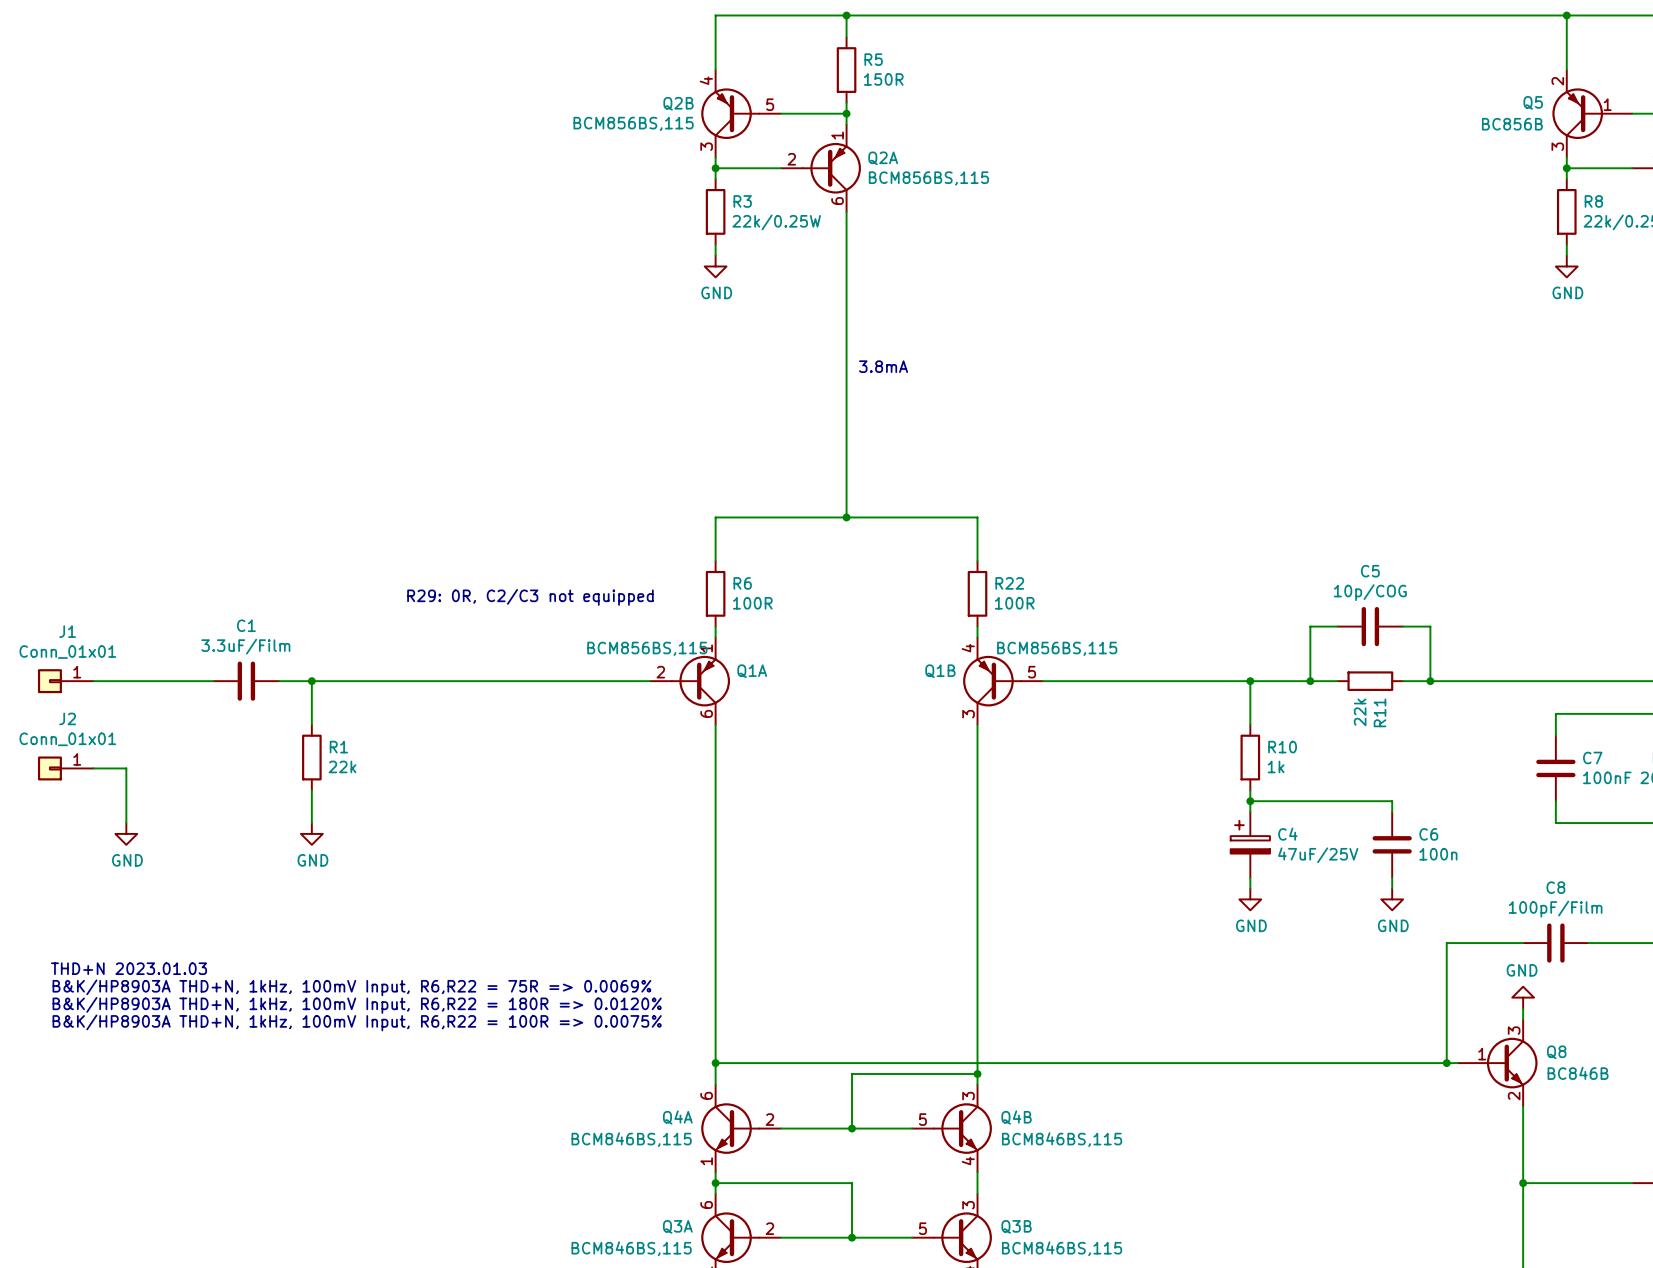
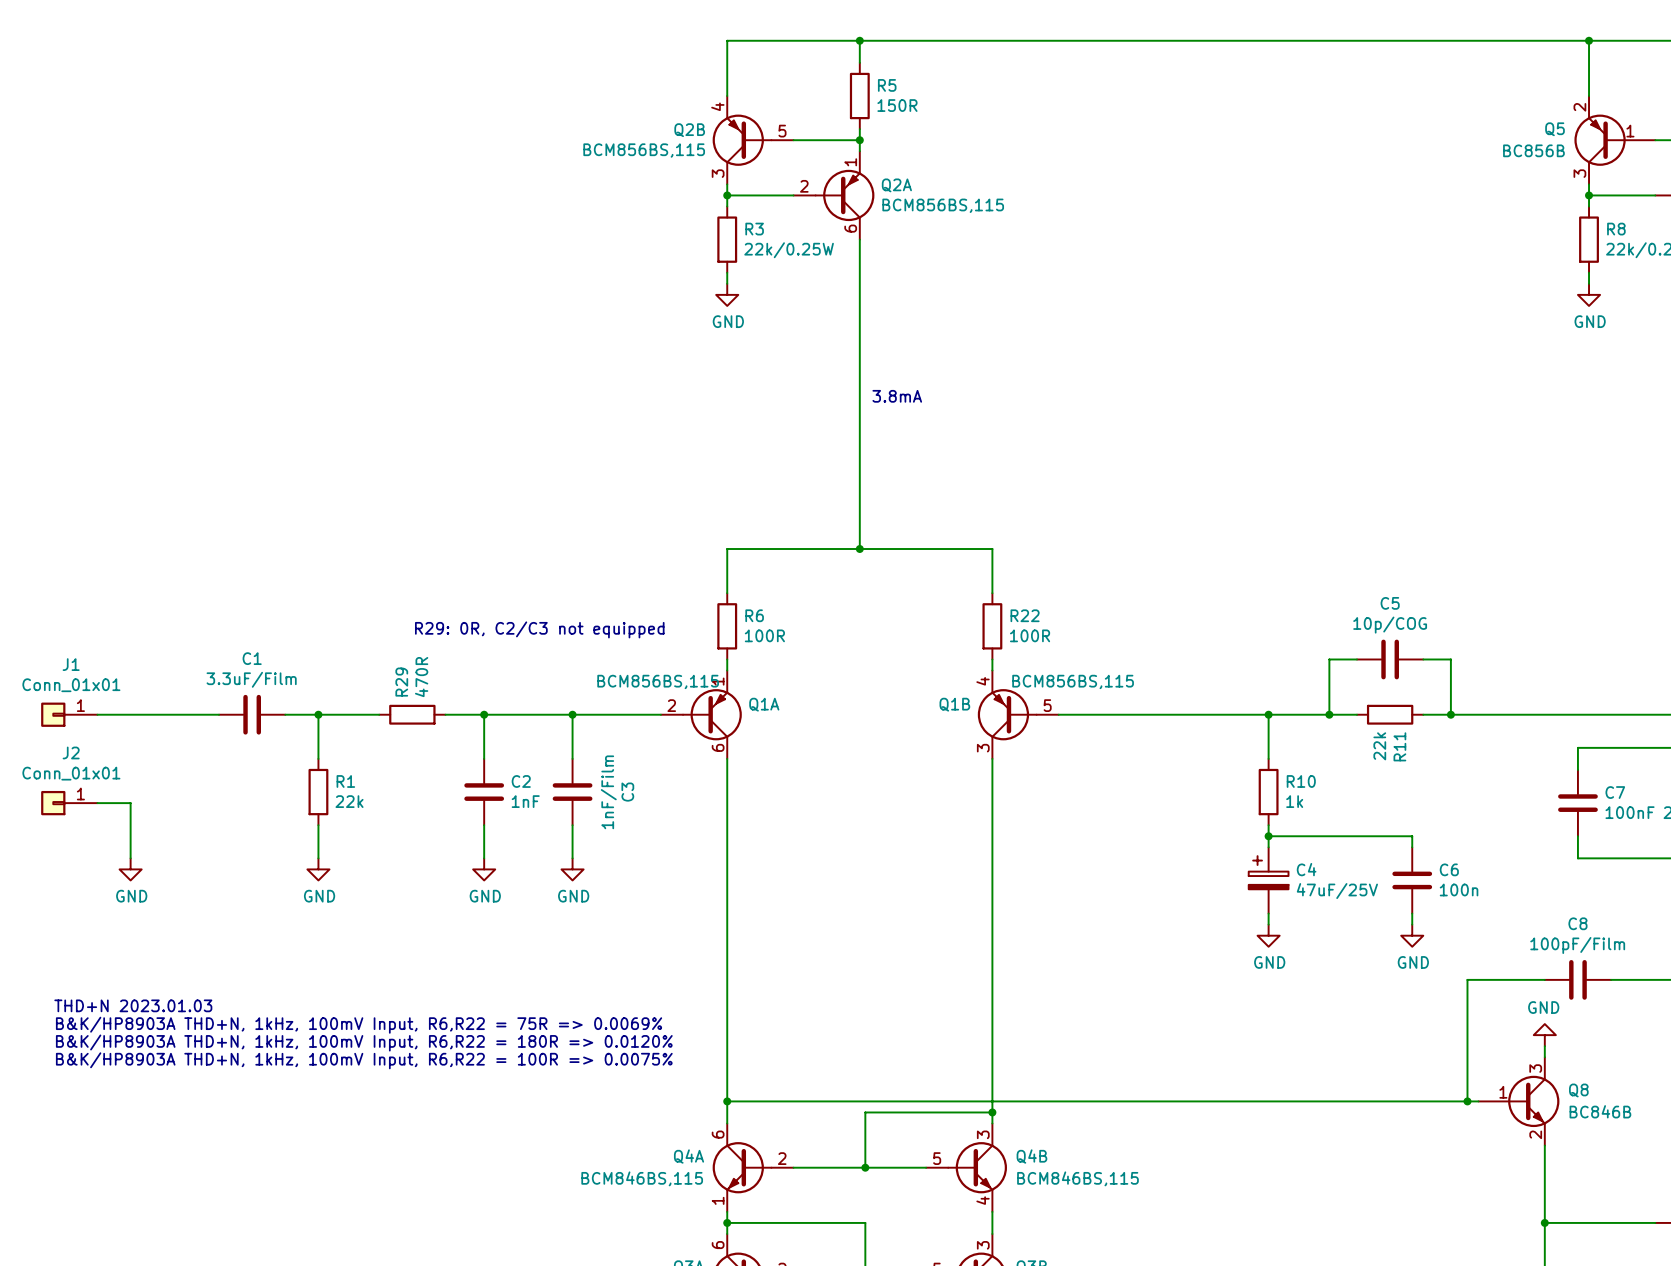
wire: (371, 681) (437, 681) -> none
R29: none -> 470R (412, 714)
wire: none -> (484, 714) (484, 758)
junction: none -> (484, 714)
wire: none -> (572, 714) (572, 758)
junction: none -> (572, 714)
C2: none -> 1nF (484, 792)
C3: none -> 1nF/Film (572, 792)
wire: none -> (484, 825) (484, 858)
wire: none -> (572, 825) (572, 858)
power symbol: none -> GND (484, 869)
power symbol: none -> GND (572, 869)

